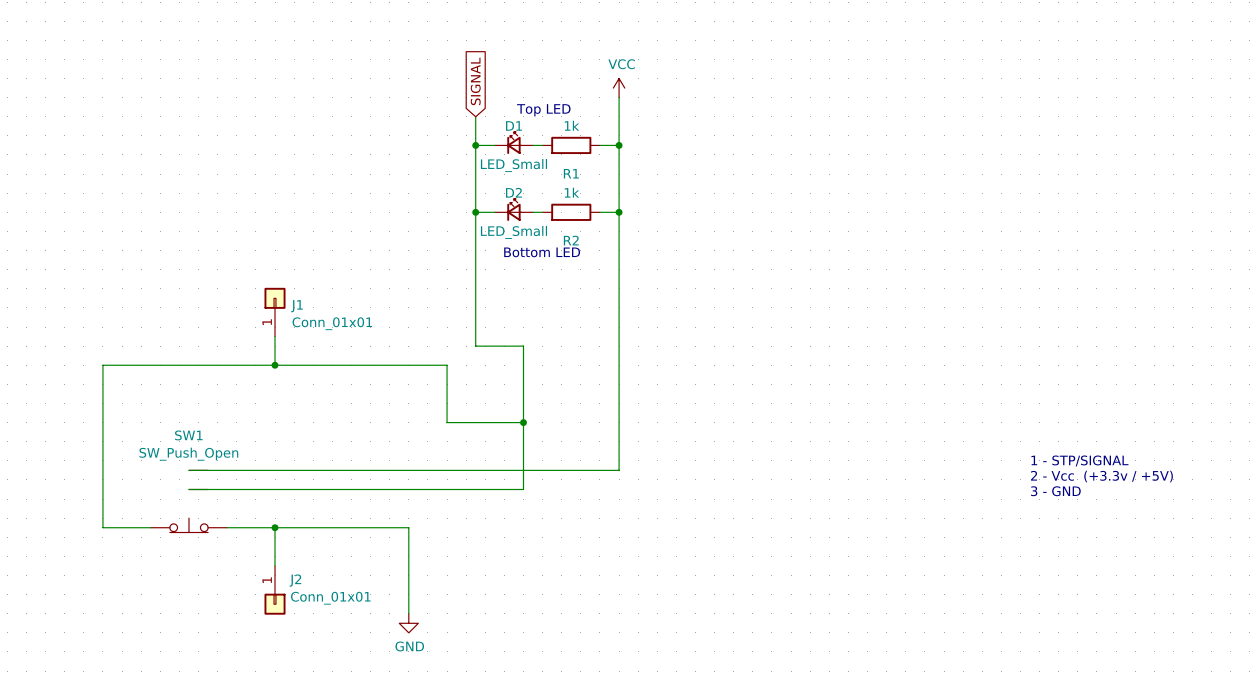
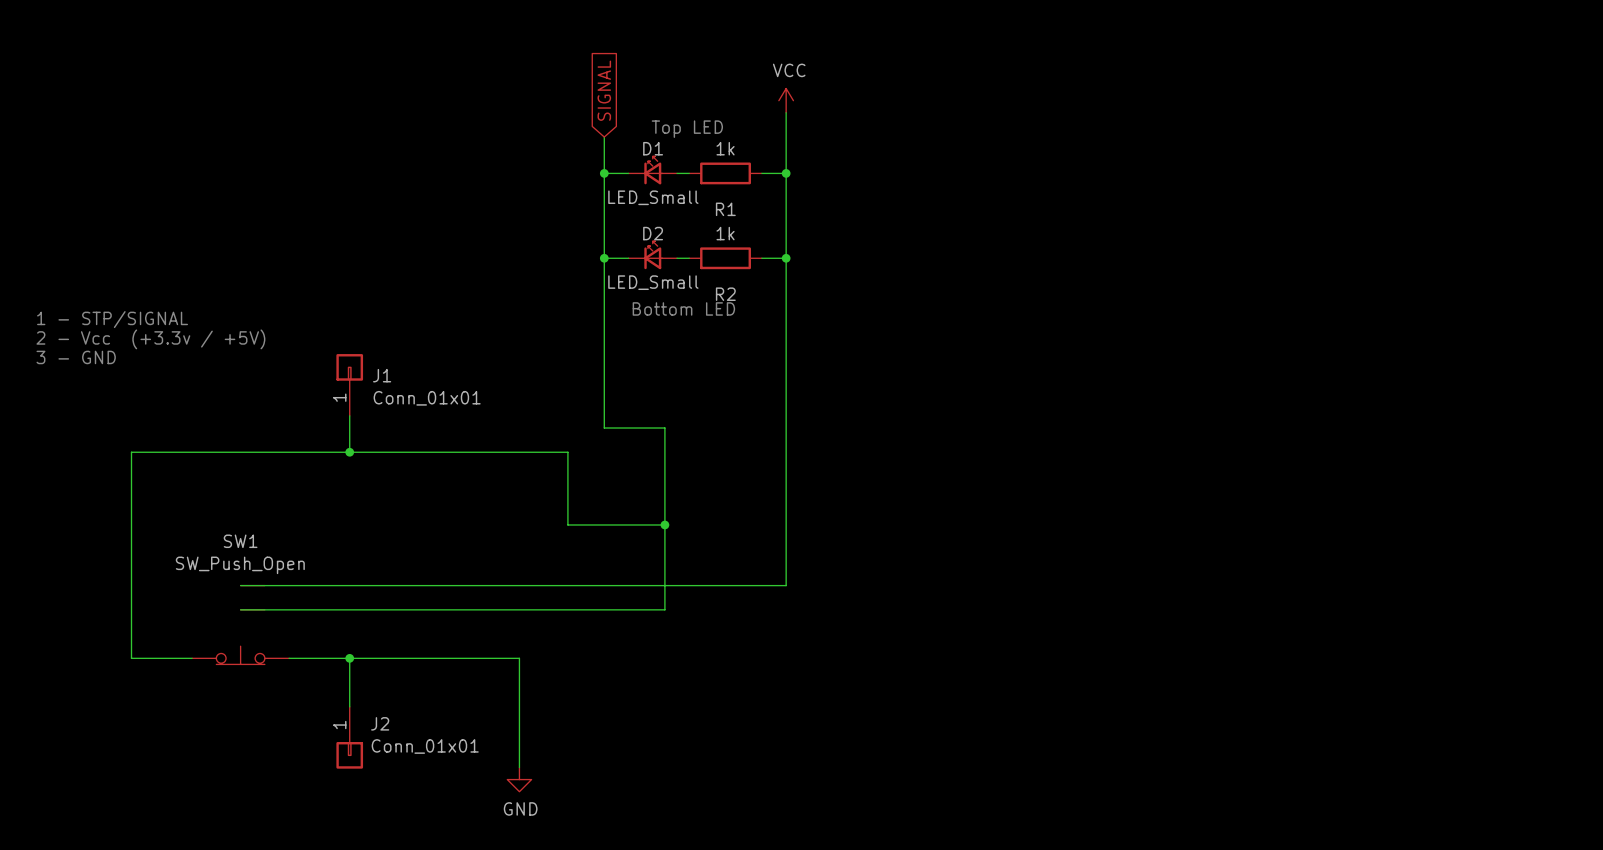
text: none -> 1 - STP/SIGNAL (112, 319)
text: none -> 2 - Vcc (+3.3v / +5V) (150, 339)
text: none -> 3 - GND (76, 357)
text: 1 - STP/SIGNAL (1079, 460) -> none
text: 2 - Vcc (+3.3v / +5V) (1101, 476) -> none
text: 3 - GND (1055, 491) -> none

